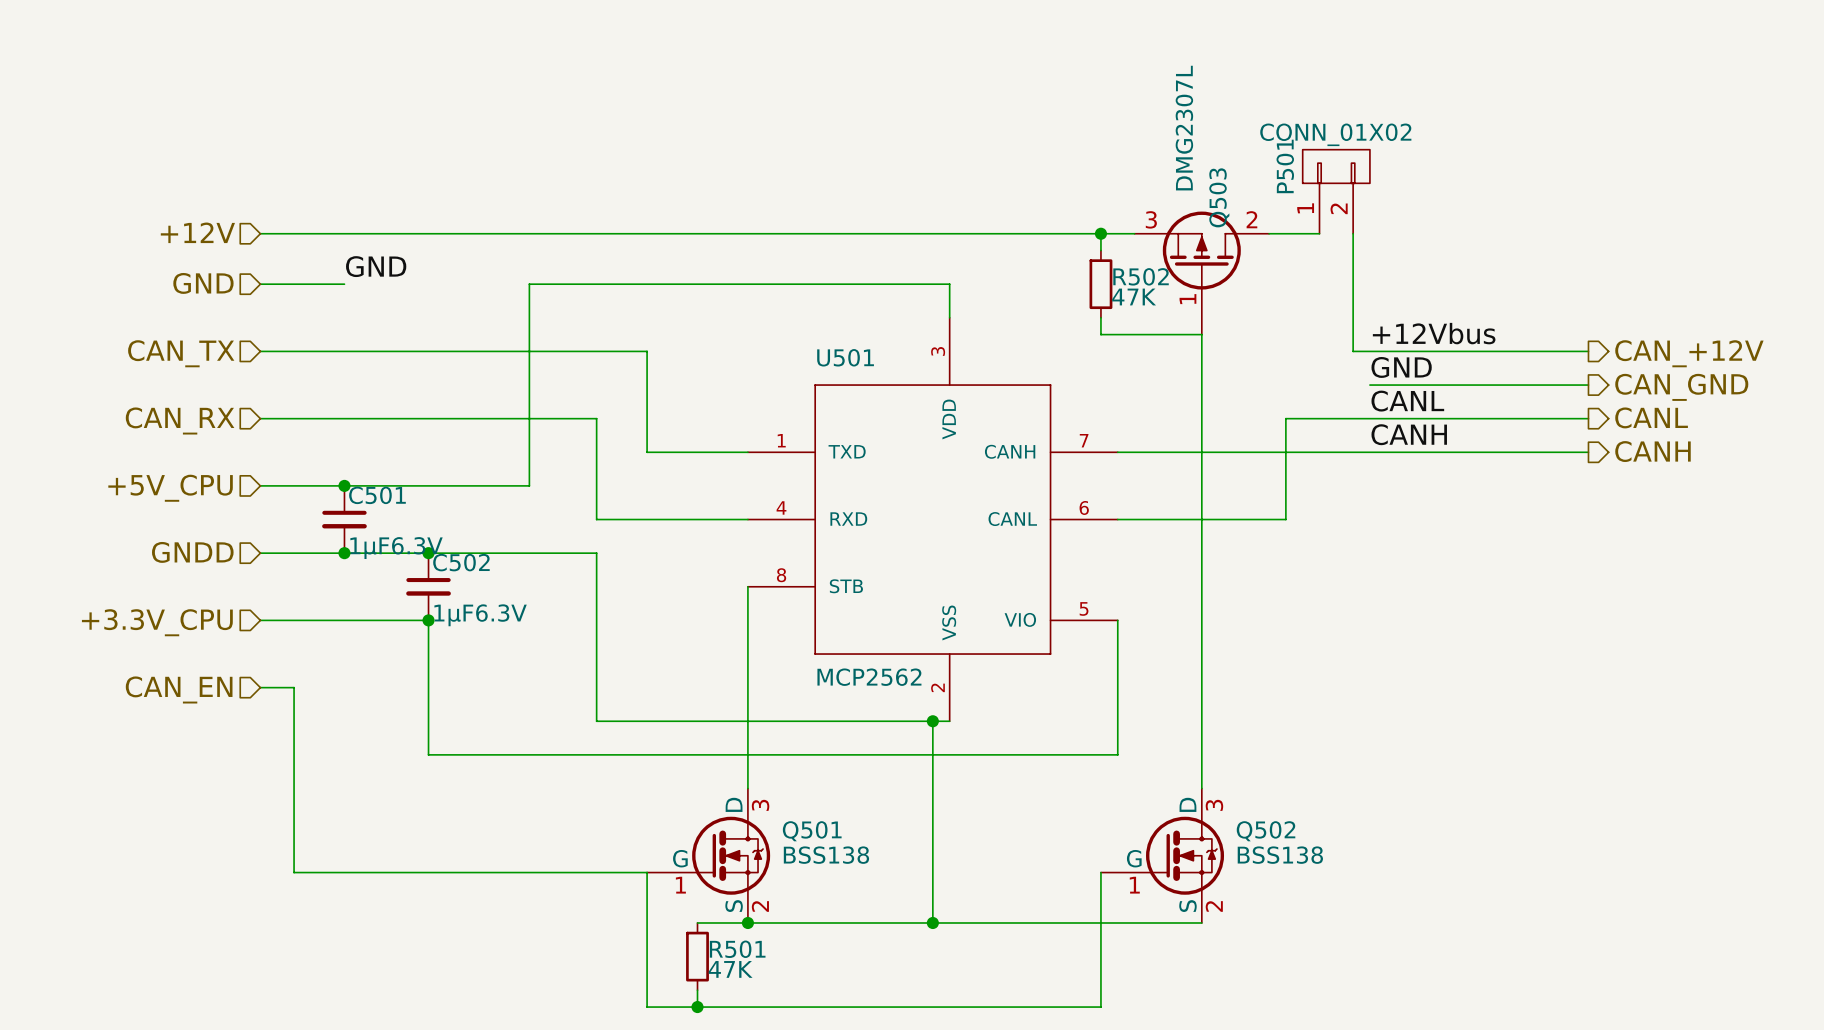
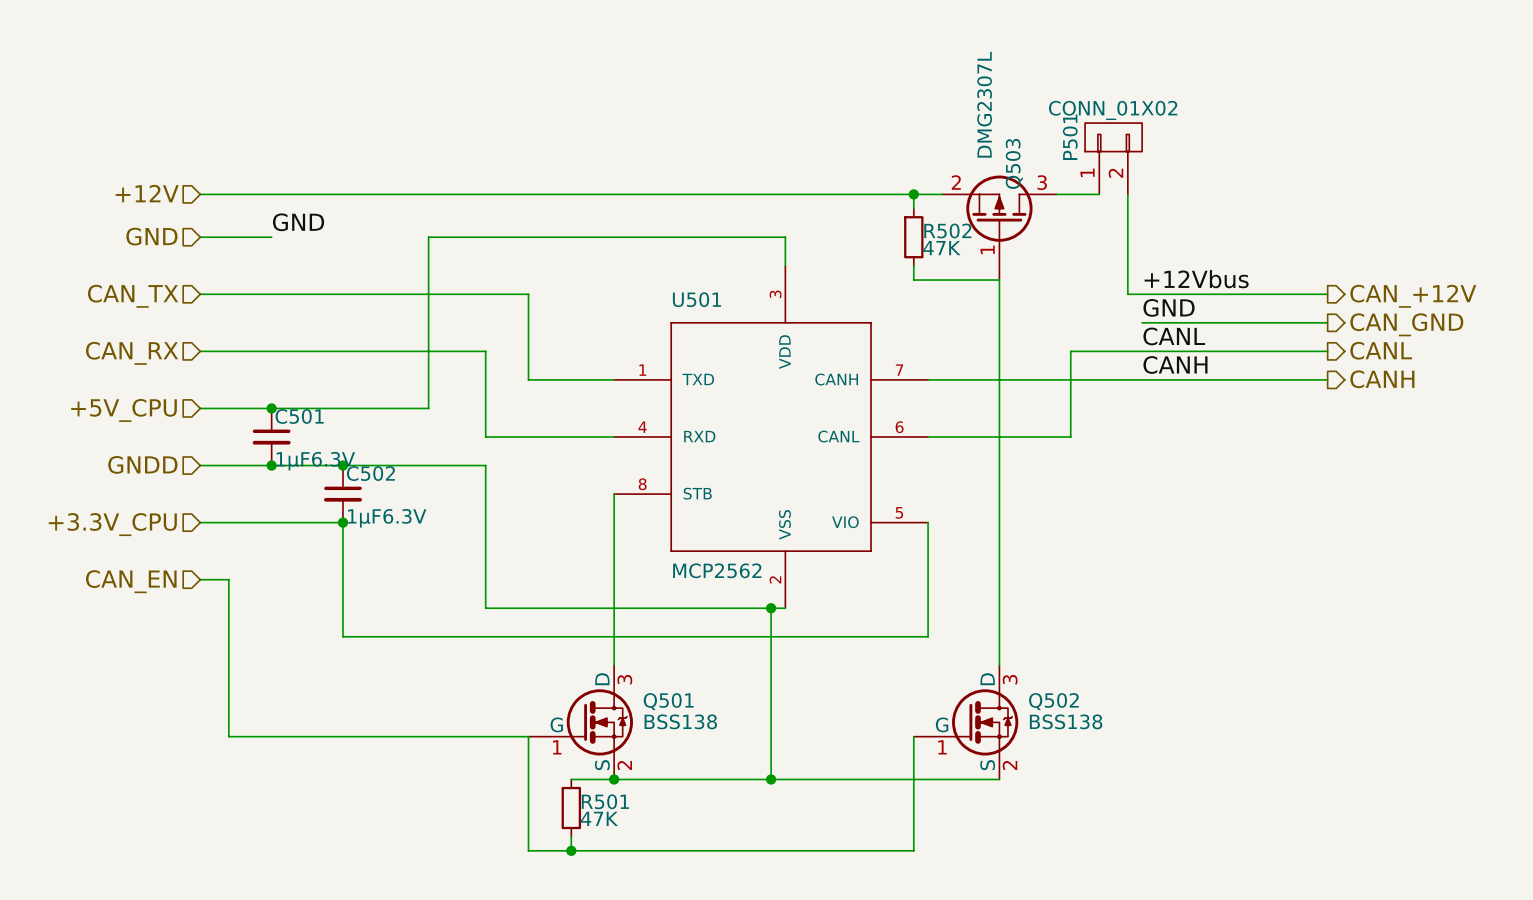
Q503 pin number: 3 (1151, 219) -> 2 (956, 182)
Q503 pin number: 2 (1251, 219) -> 3 (1042, 182)

